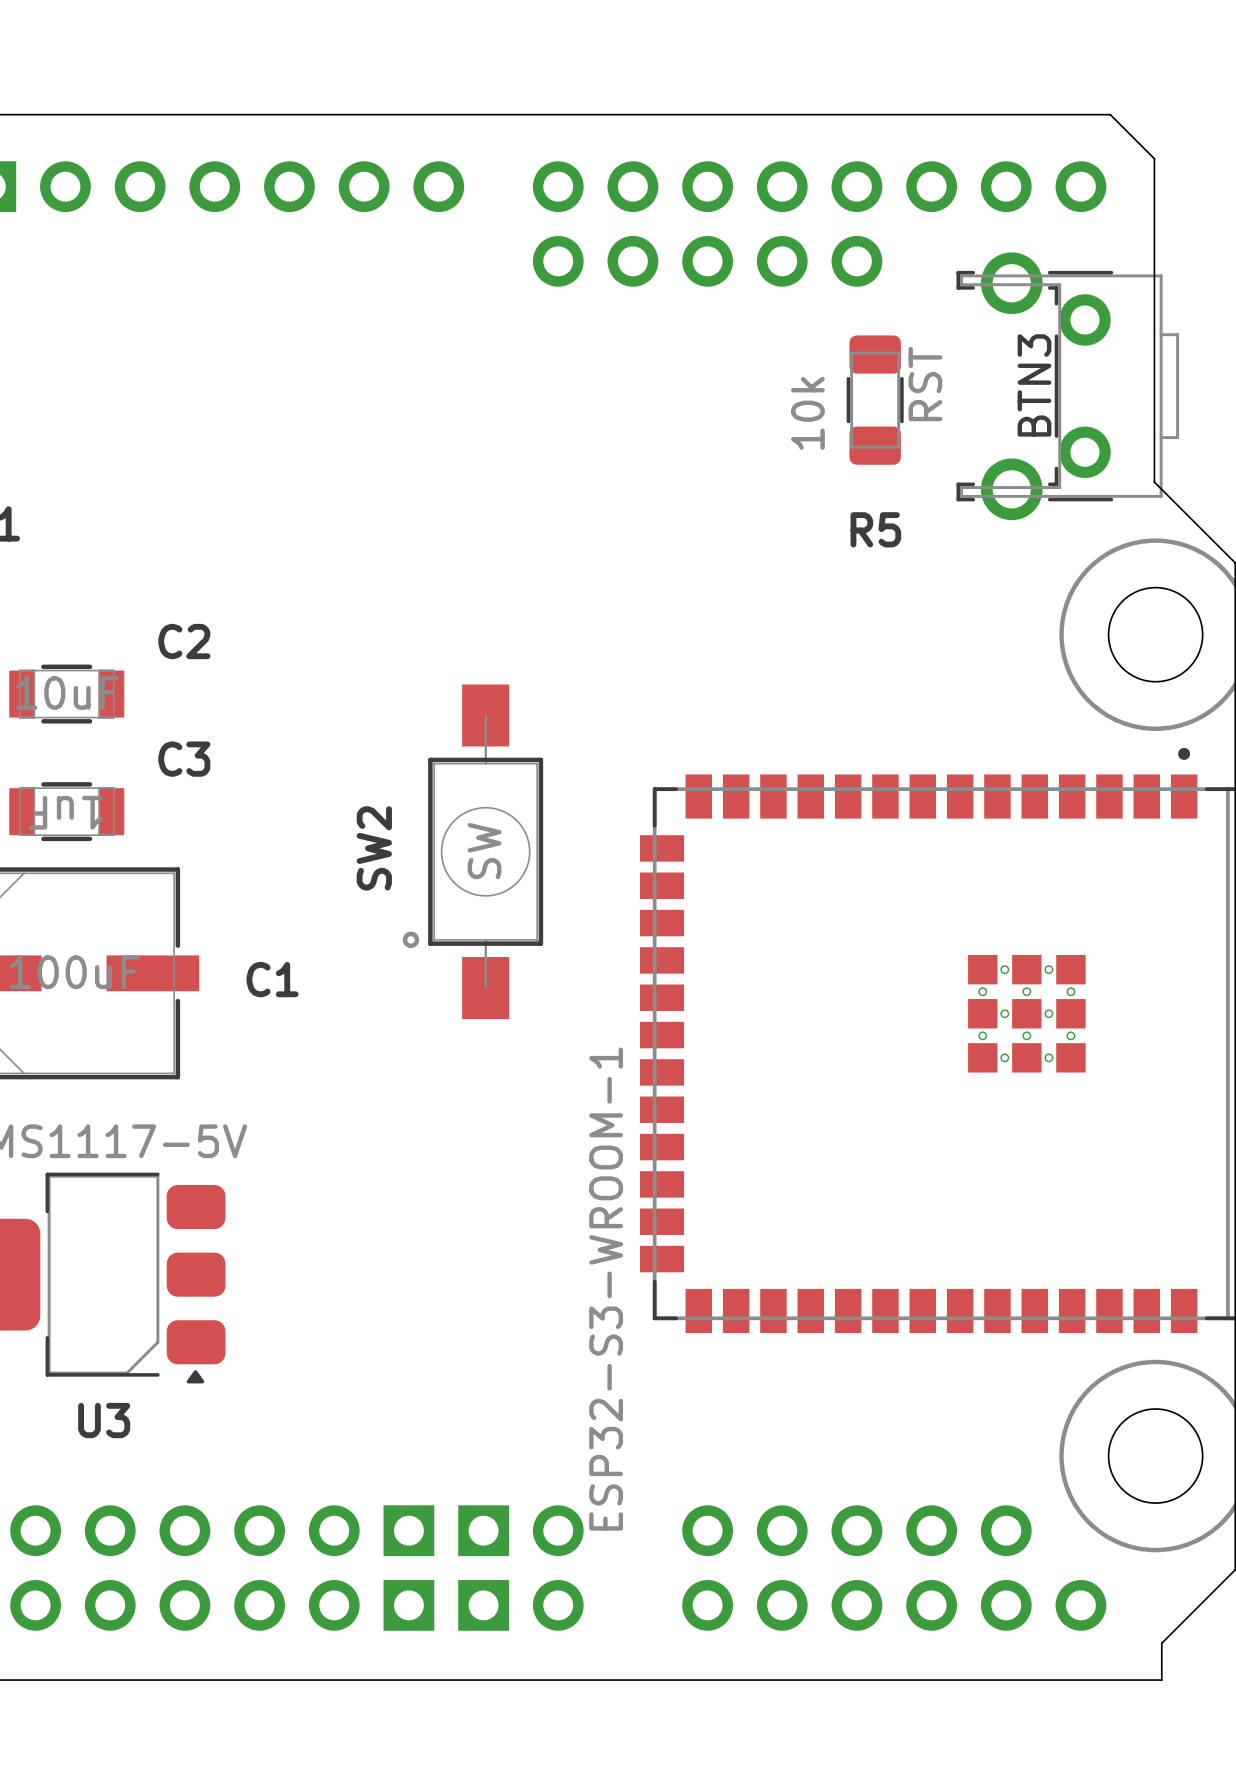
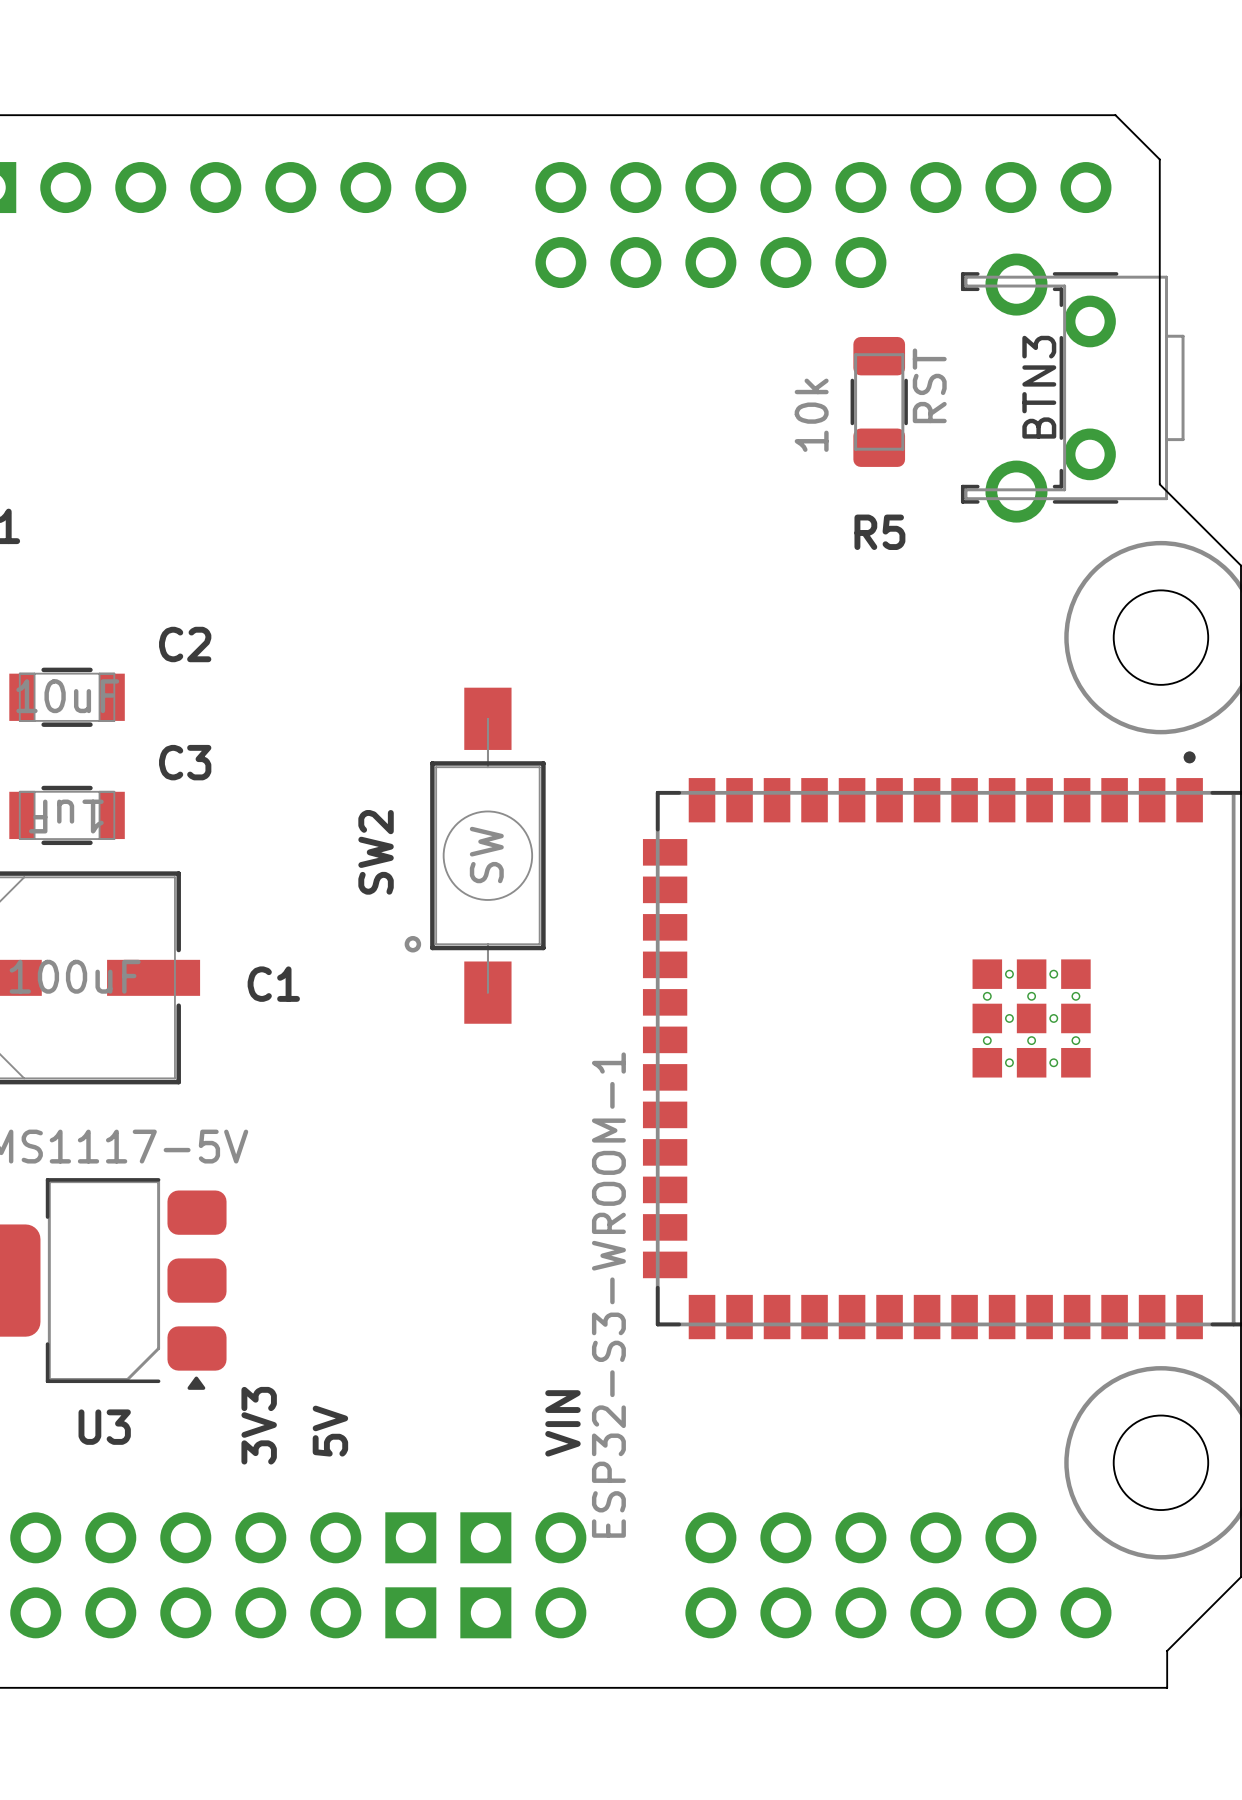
text: none -> VIN (562, 1423)
text: none -> 3V3 (259, 1425)
text: none -> 5V (330, 1431)

